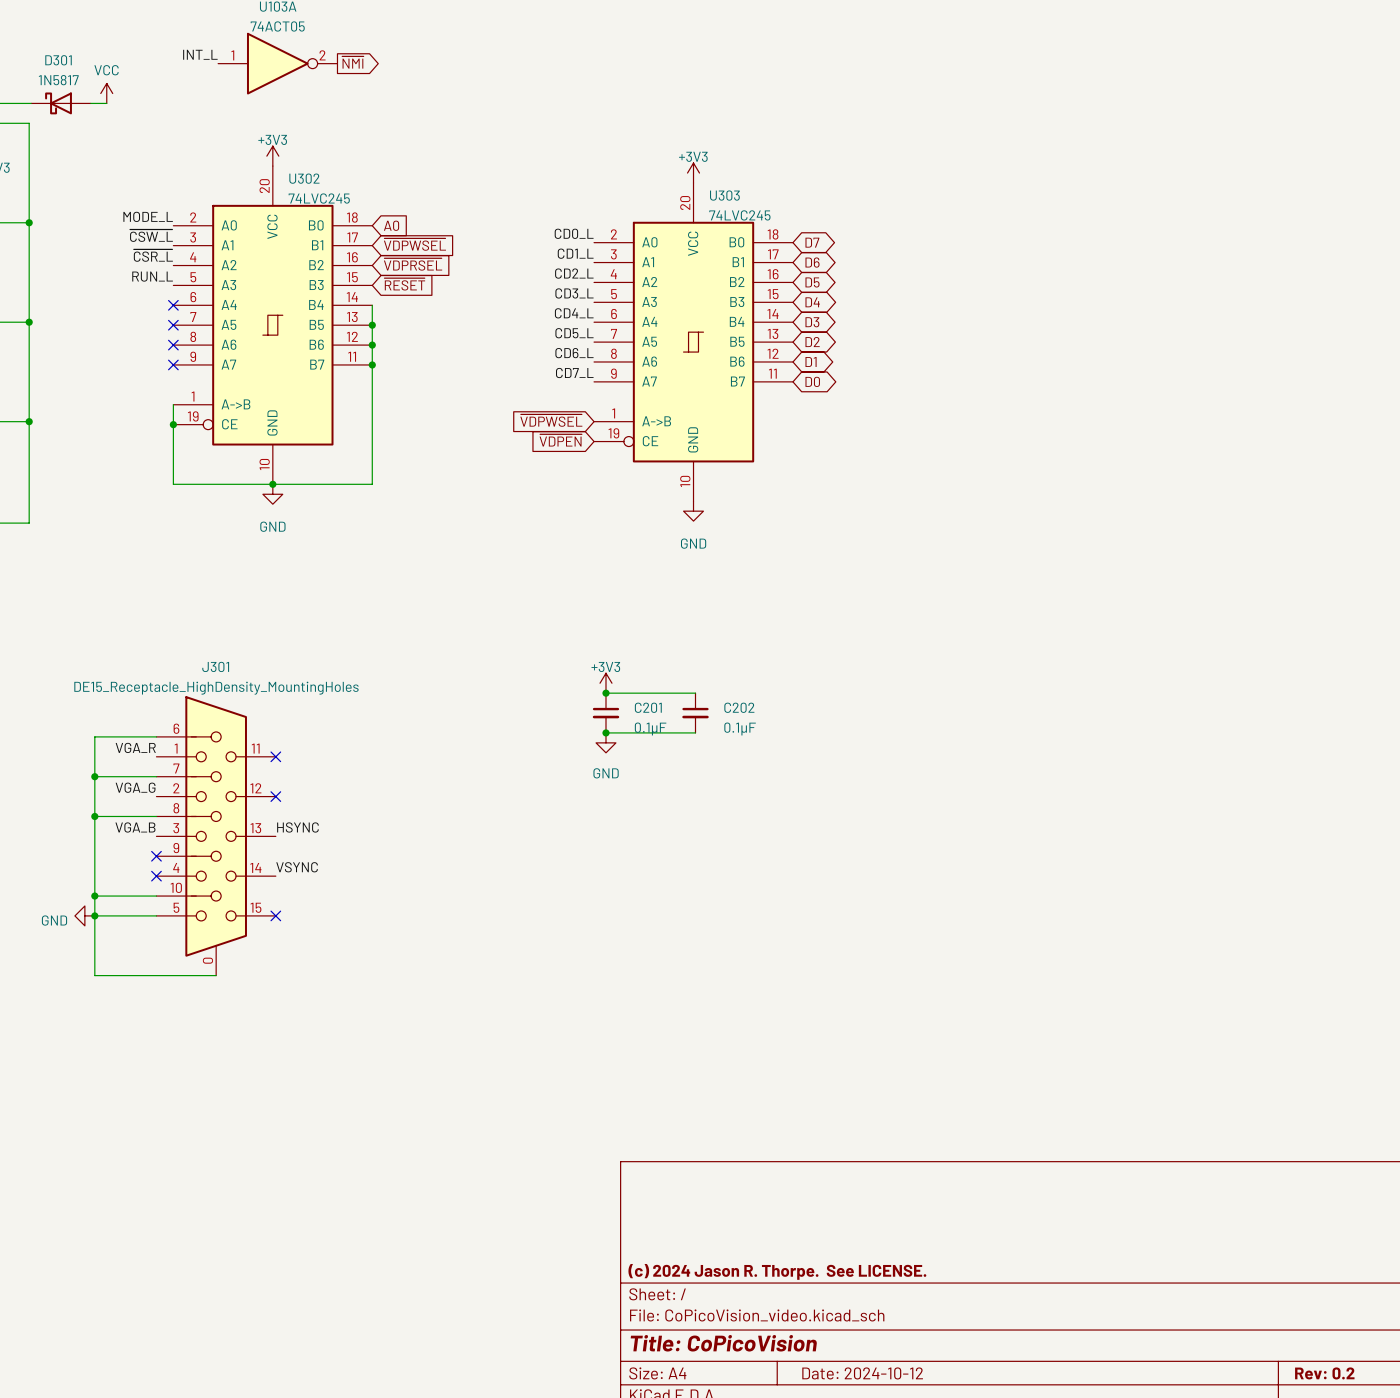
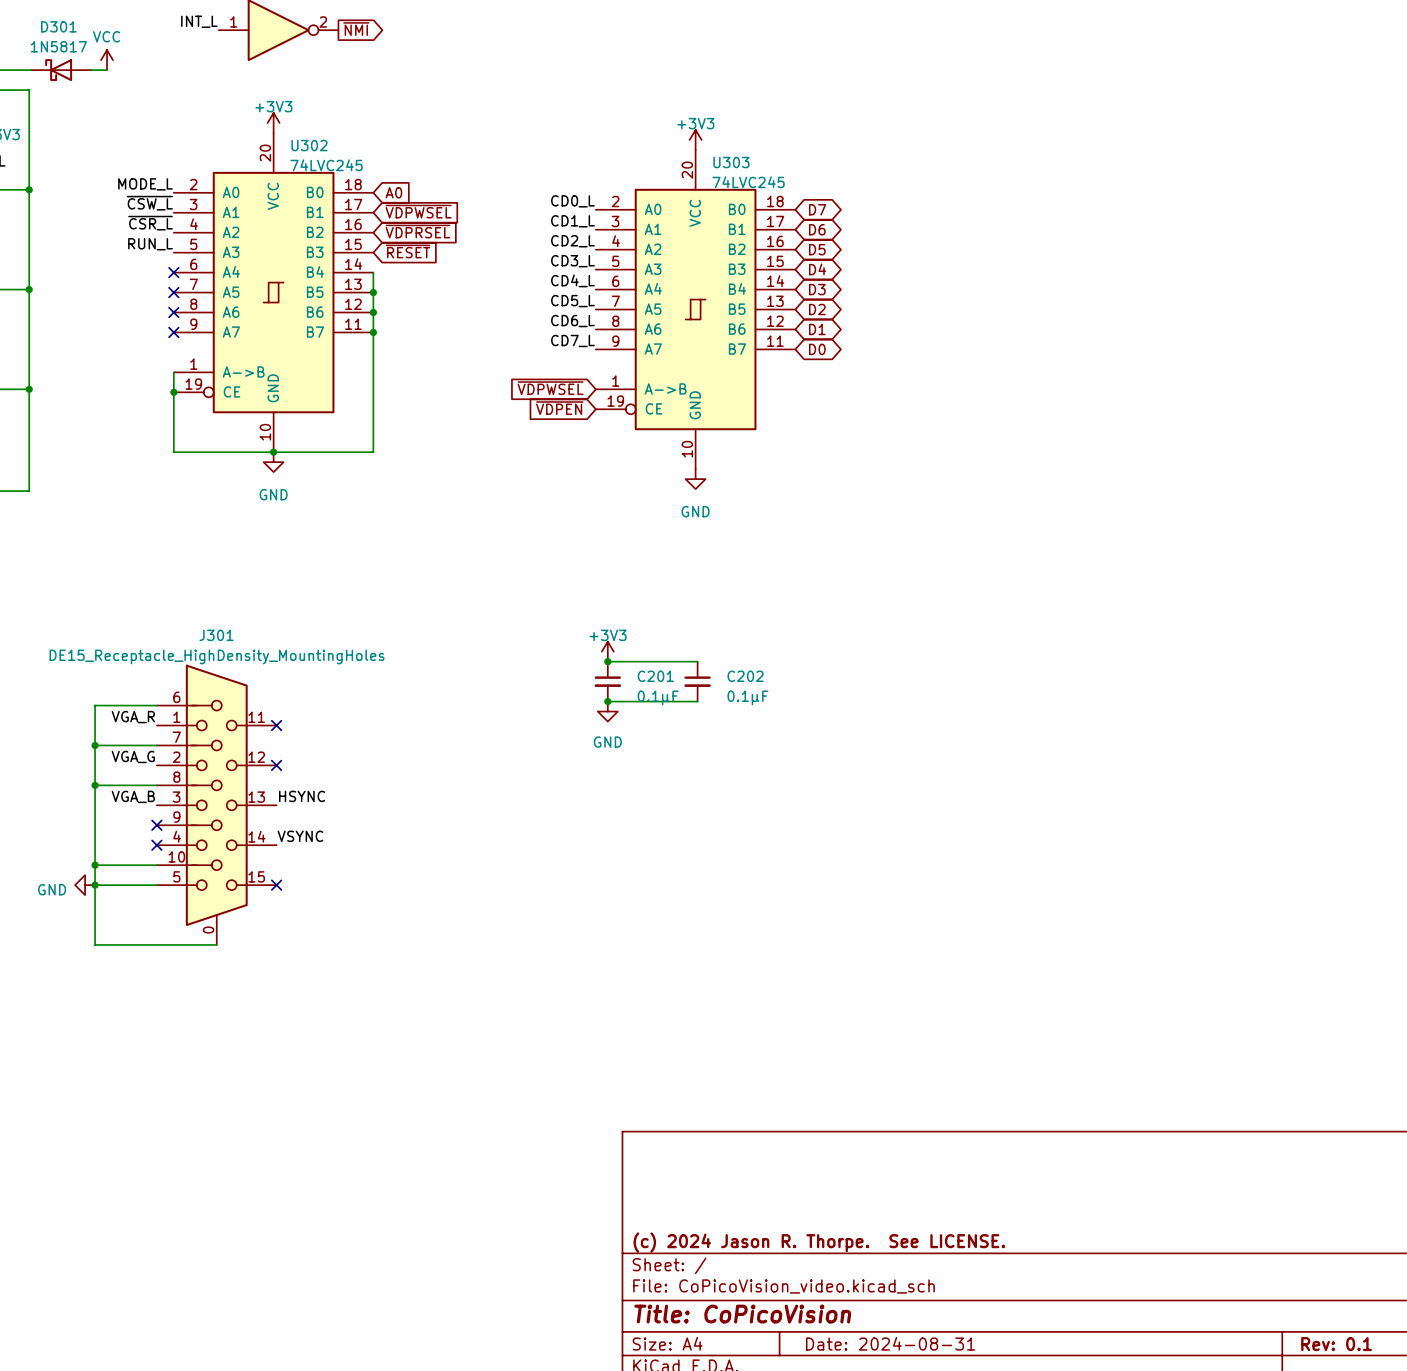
title block: Date: 2024-10-12 (862, 1373) -> Date: 2024-08-31 (890, 1343)
title block: Rev: 0.2 (1324, 1373) -> Rev: 0.1 (1336, 1344)

